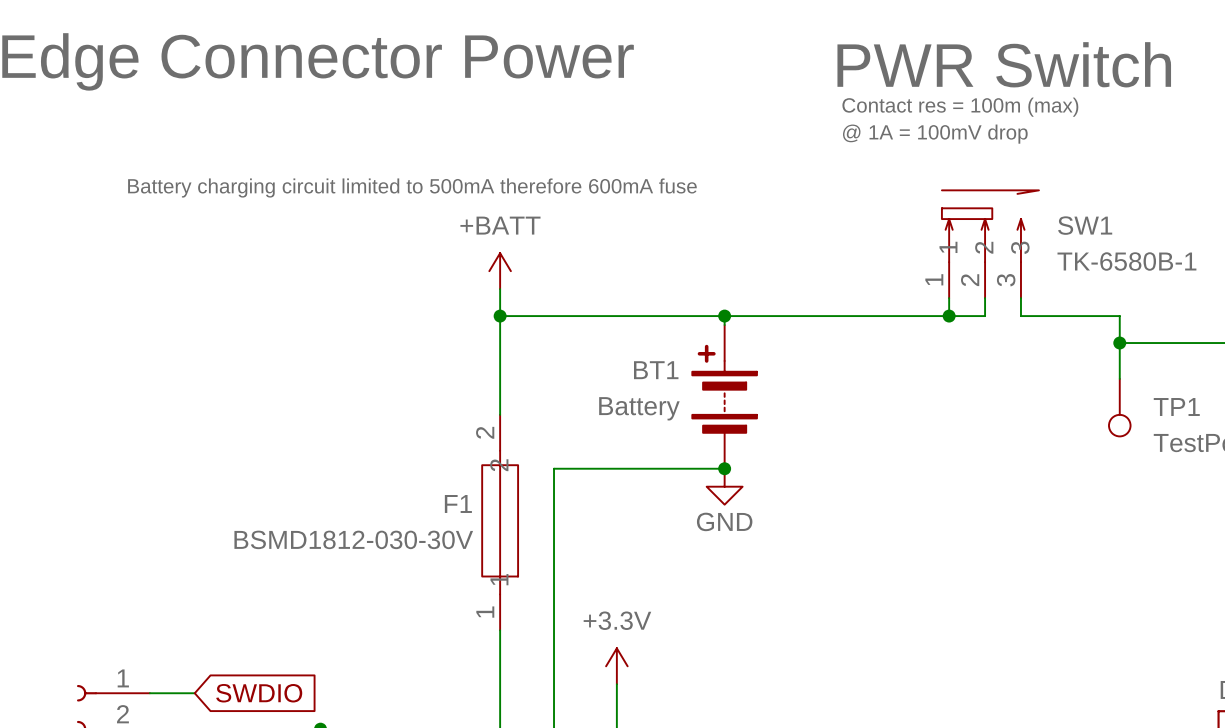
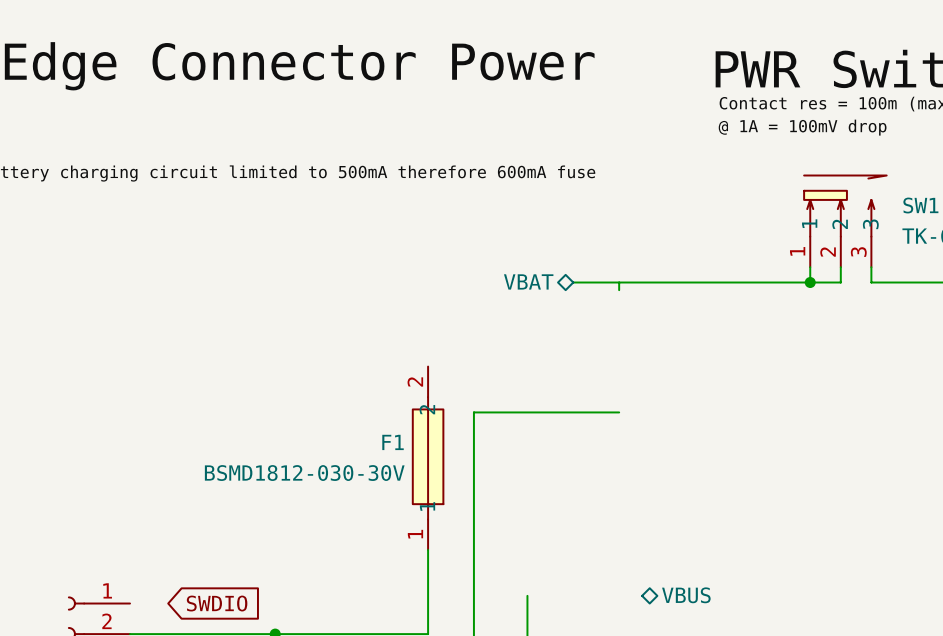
power symbol: +BATT (500, 271) -> none
wire: (500, 289) (500, 414) -> none
sheet pin: none -> VBAT (528, 281)
wire: (500, 316) (670, 316) -> none
junction: (500, 316) -> none
junction: (724, 316) -> none
BT1: Battery (724, 396) -> none
junction: (724, 468) -> none
power symbol: GND (724, 486) -> none
power symbol: +3.3V (616, 666) -> none
sheet pin: none -> VBUS (686, 595)
wire: (149, 693) (194, 693) -> none

